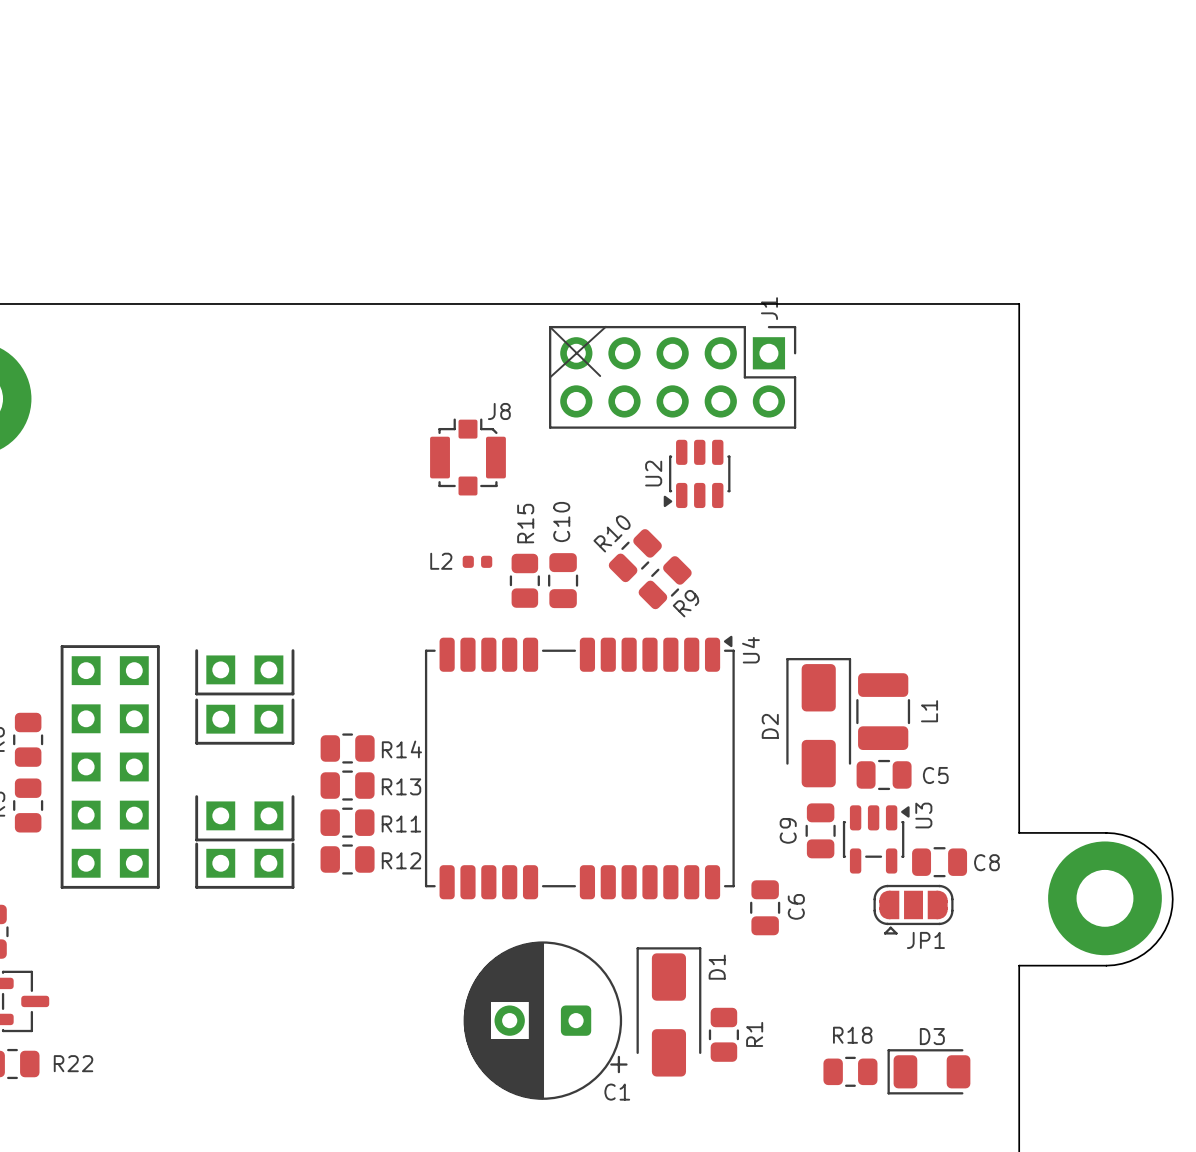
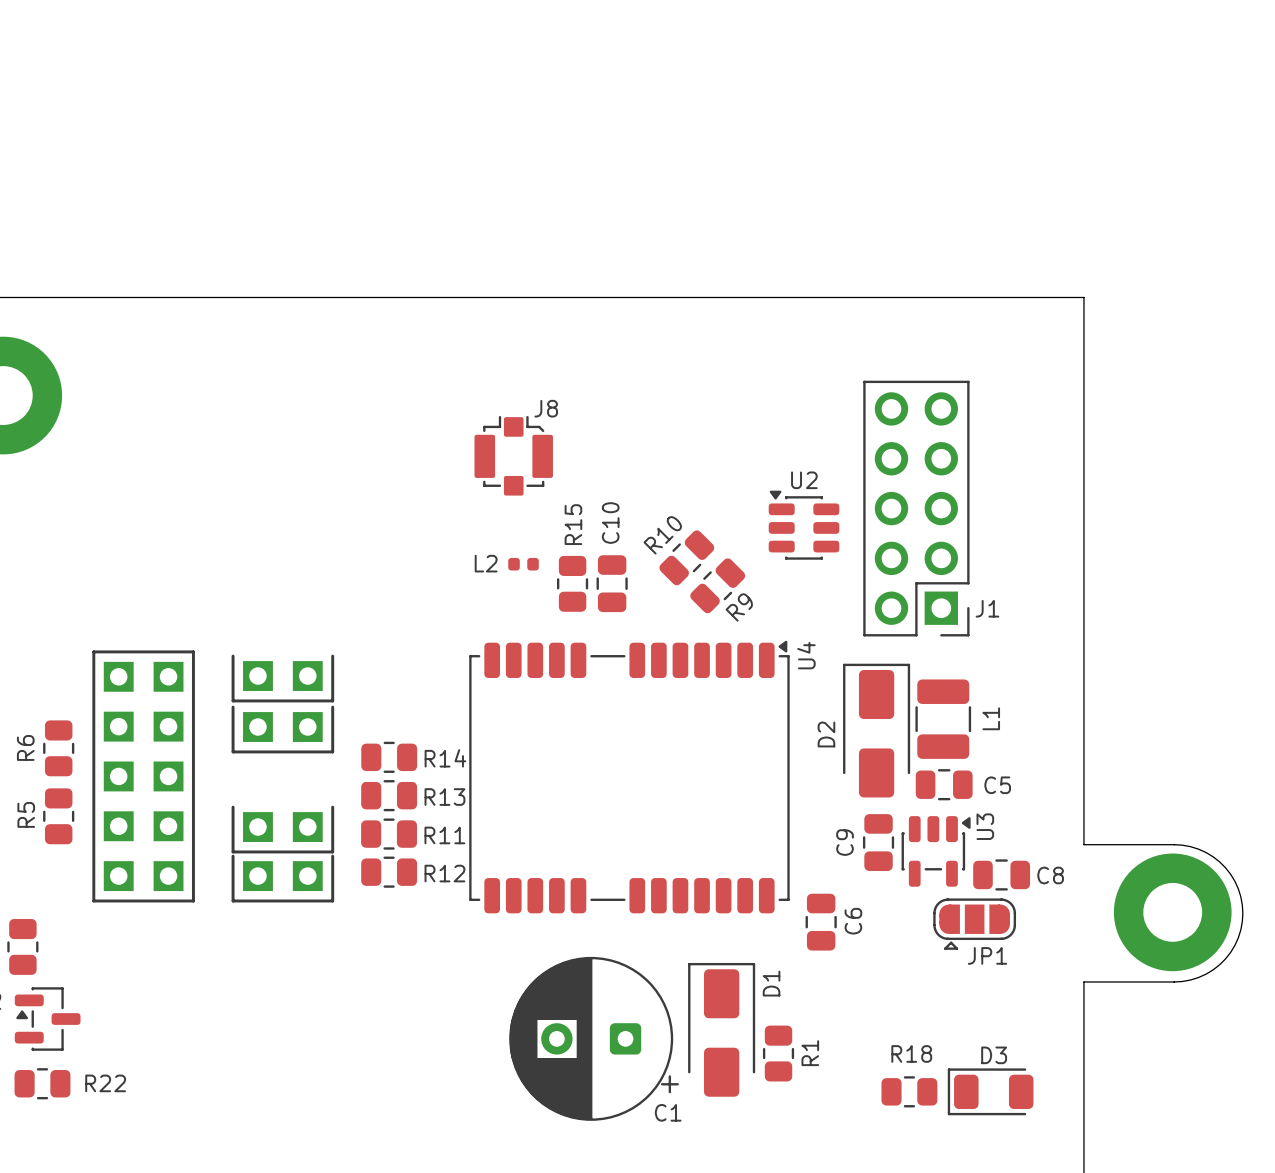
line: (605, 326) (550, 377) -> none
line: (550, 327) (600, 376) -> none
J1 rotation: 0° (672, 377) -> 90° clockwise (916, 508)
J1 position: (672, 377) -> (916, 508)
U2 rotation: 0° (697, 473) -> 90° clockwise (804, 525)
U2 position: (697, 473) -> (804, 525)

